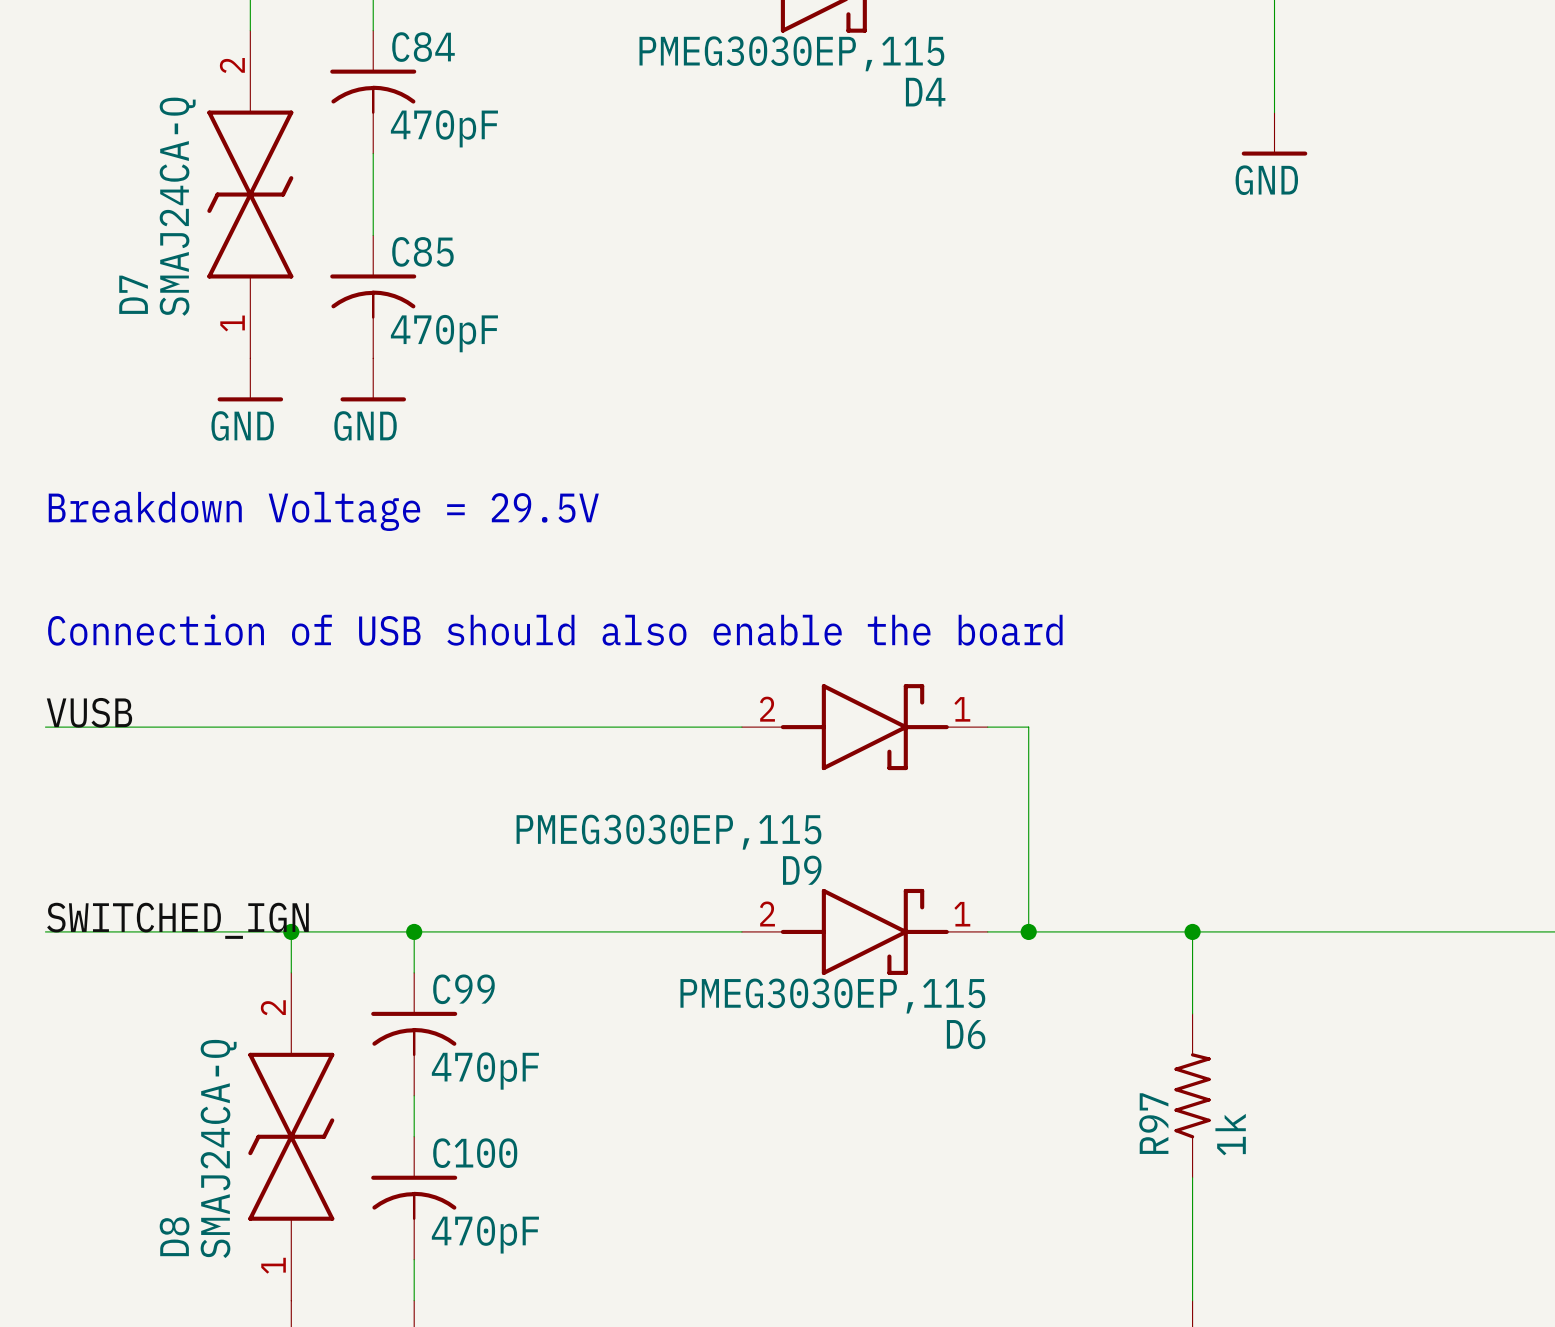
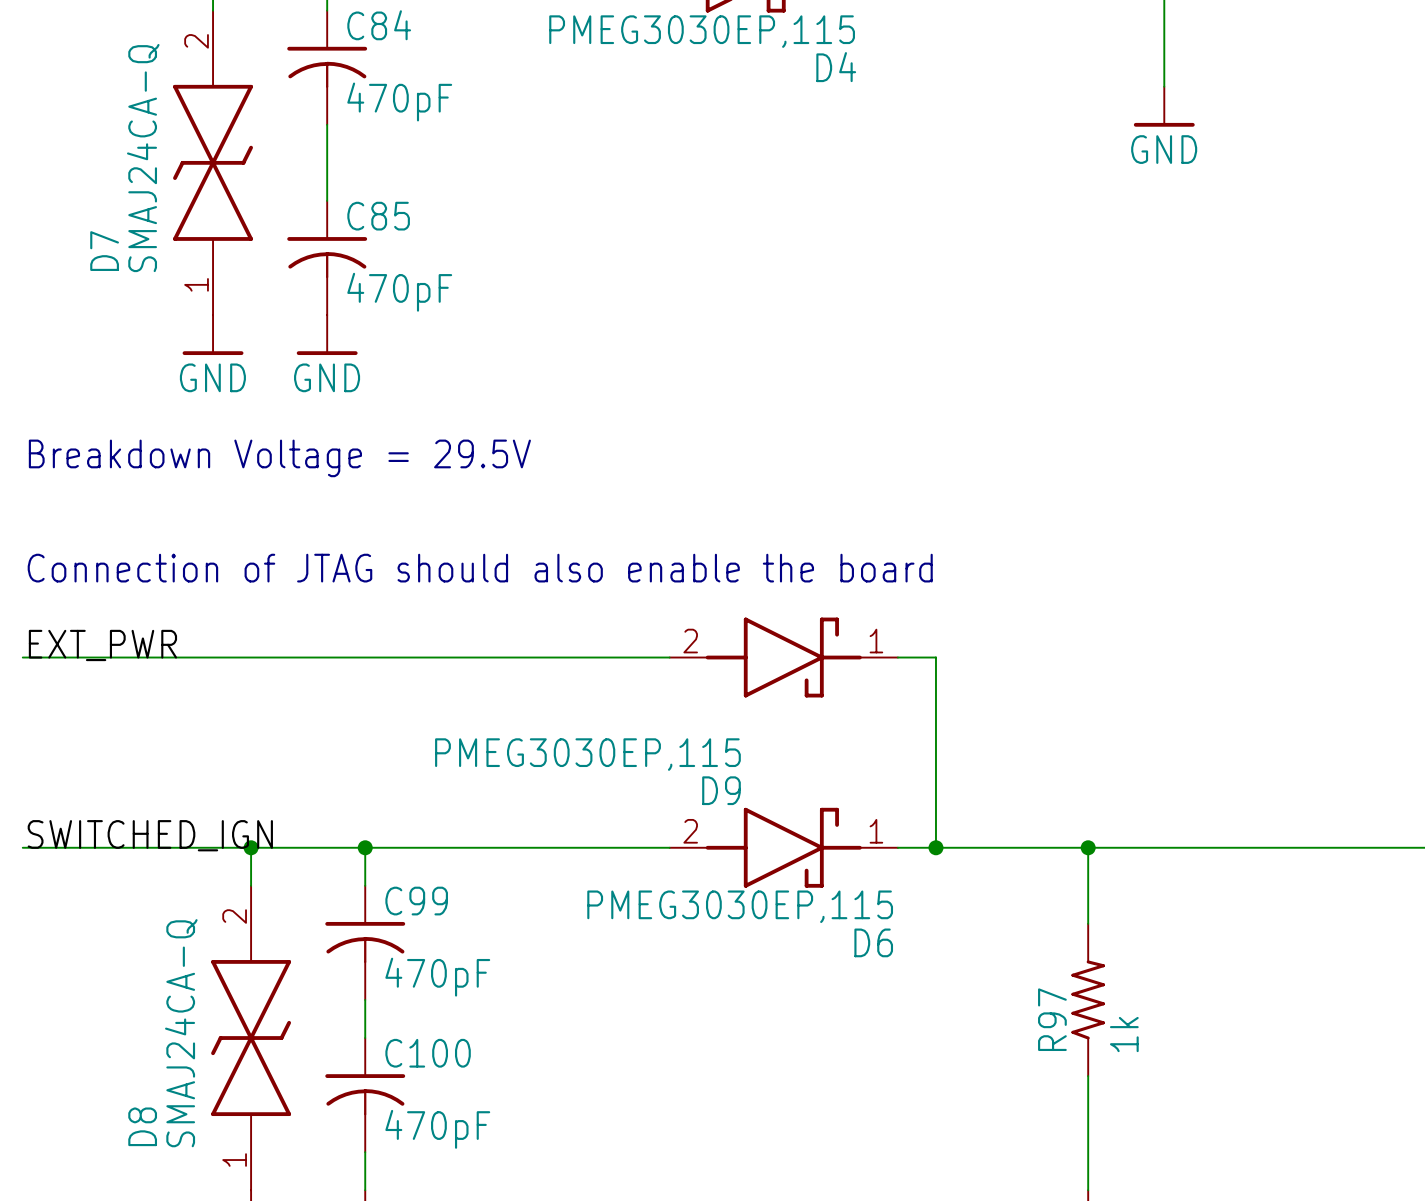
text: Connection of USB should also enable the board (555, 630) -> Connection of JTAG should also enable the board (480, 568)
label: VUSB (89, 712) -> EXT_PWR (102, 645)

